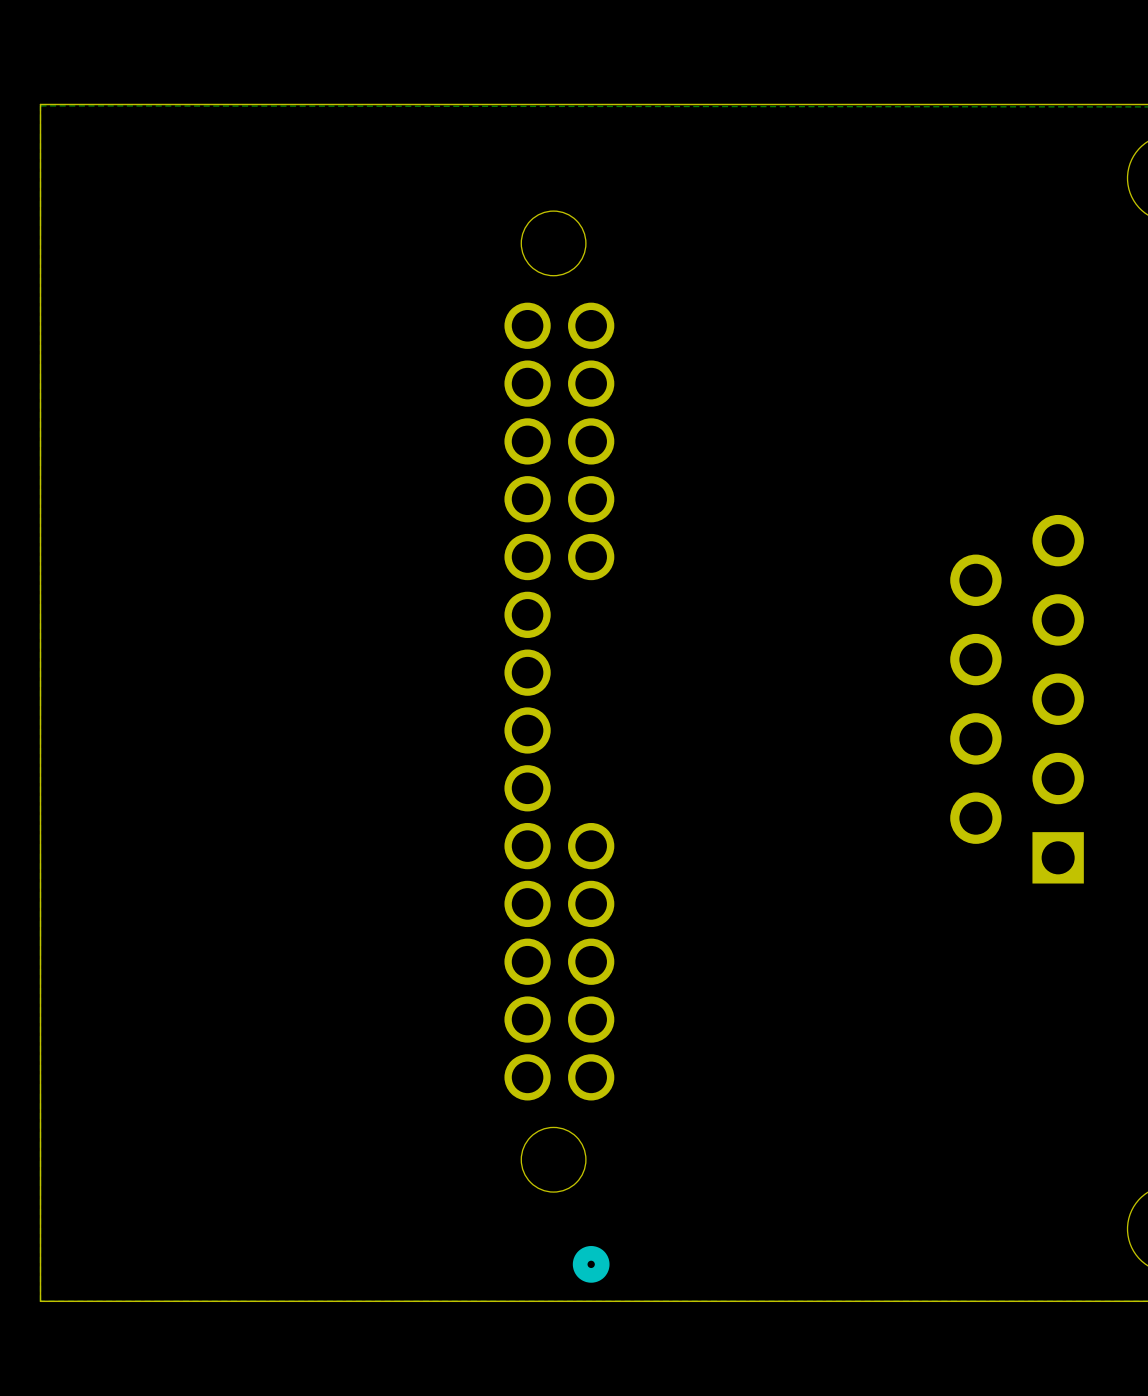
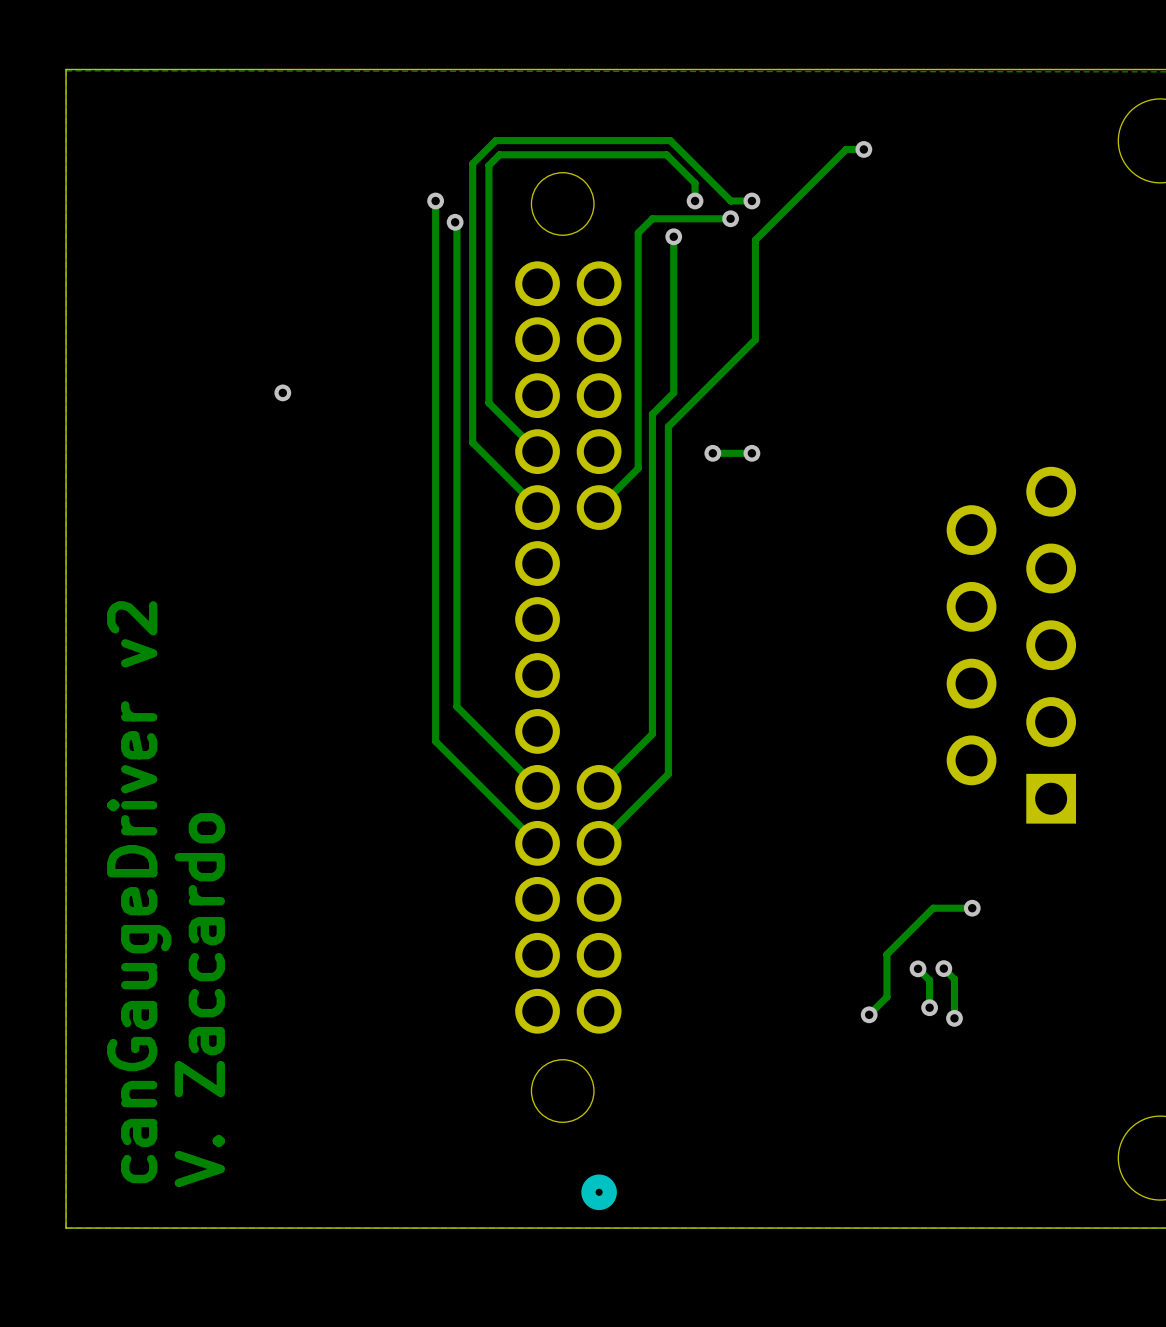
track: none -> (863, 149) (846, 149) (755, 240) (755, 339) (668, 426) (668, 774) (599, 843)
via: none -> (863, 149)
track: none -> (435, 200) (435, 741) (537, 843)
via: none -> (435, 200)
track: none -> (695, 200) (695, 183) (666, 154) (499, 154) (488, 165) (488, 403) (537, 451)
via: none -> (695, 200)
track: none -> (751, 200) (730, 200) (670, 140) (495, 140) (472, 163) (472, 442) (537, 507)
via: none -> (751, 200)
track: none -> (730, 218) (652, 218) (638, 232) (638, 468) (599, 507)
via: none -> (730, 218)
track: none -> (455, 222) (456, 224) (456, 706) (537, 787)
via: none -> (455, 222)
track: none -> (673, 236) (673, 392) (652, 414) (652, 734) (599, 787)
via: none -> (673, 236)
via: none -> (282, 392)
via: none -> (712, 453)
track: none -> (751, 453) (712, 453)
via: none -> (751, 453)
text: none -> canGaugeDriver v2 (139, 892)
track: none -> (972, 908) (933, 908) (886, 954) (886, 997) (869, 1014)
via: none -> (972, 908)
track: none -> (918, 968) (929, 980) (929, 1007)
via: none -> (918, 968)
track: none -> (943, 968) (954, 979) (954, 1018)
via: none -> (943, 968)
text: none -> V. Zaccardo (199, 1000)
via: none -> (929, 1007)
via: none -> (869, 1014)
via: none -> (954, 1018)

